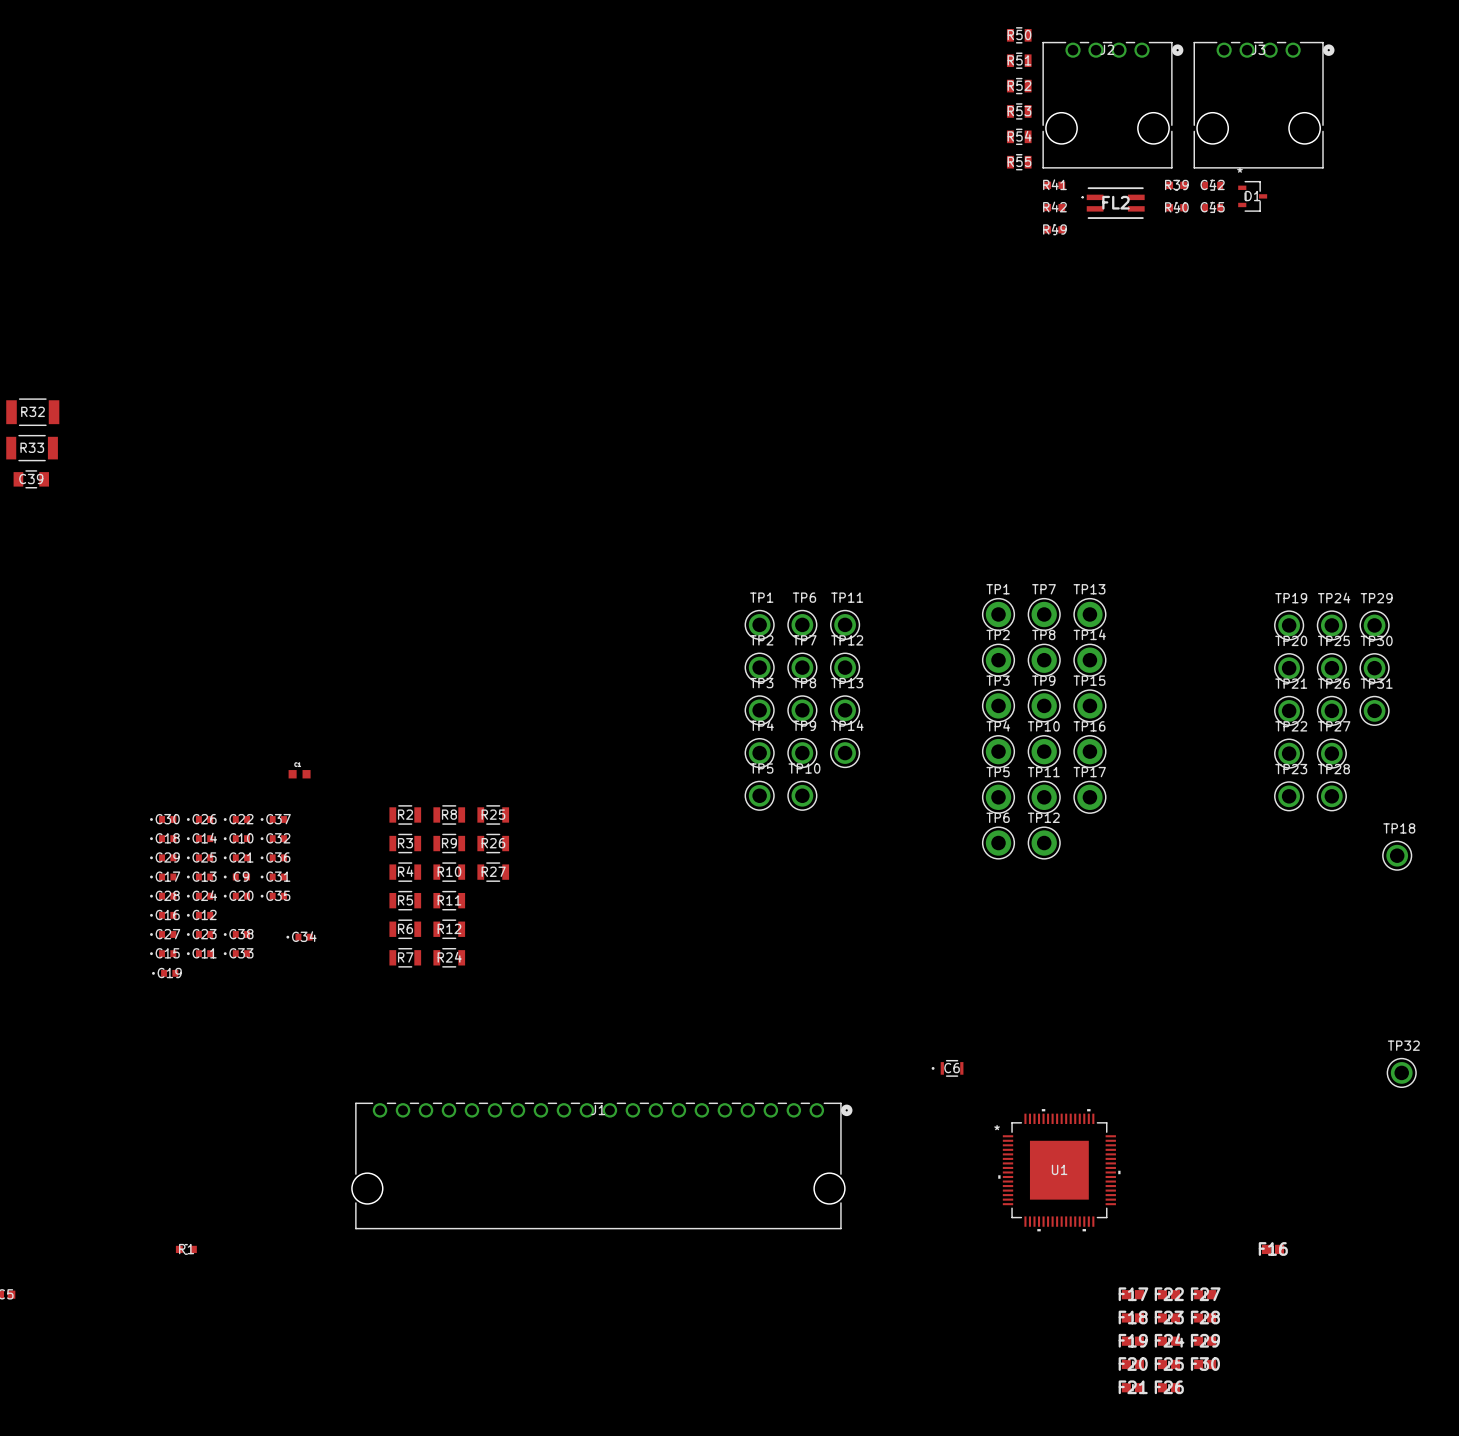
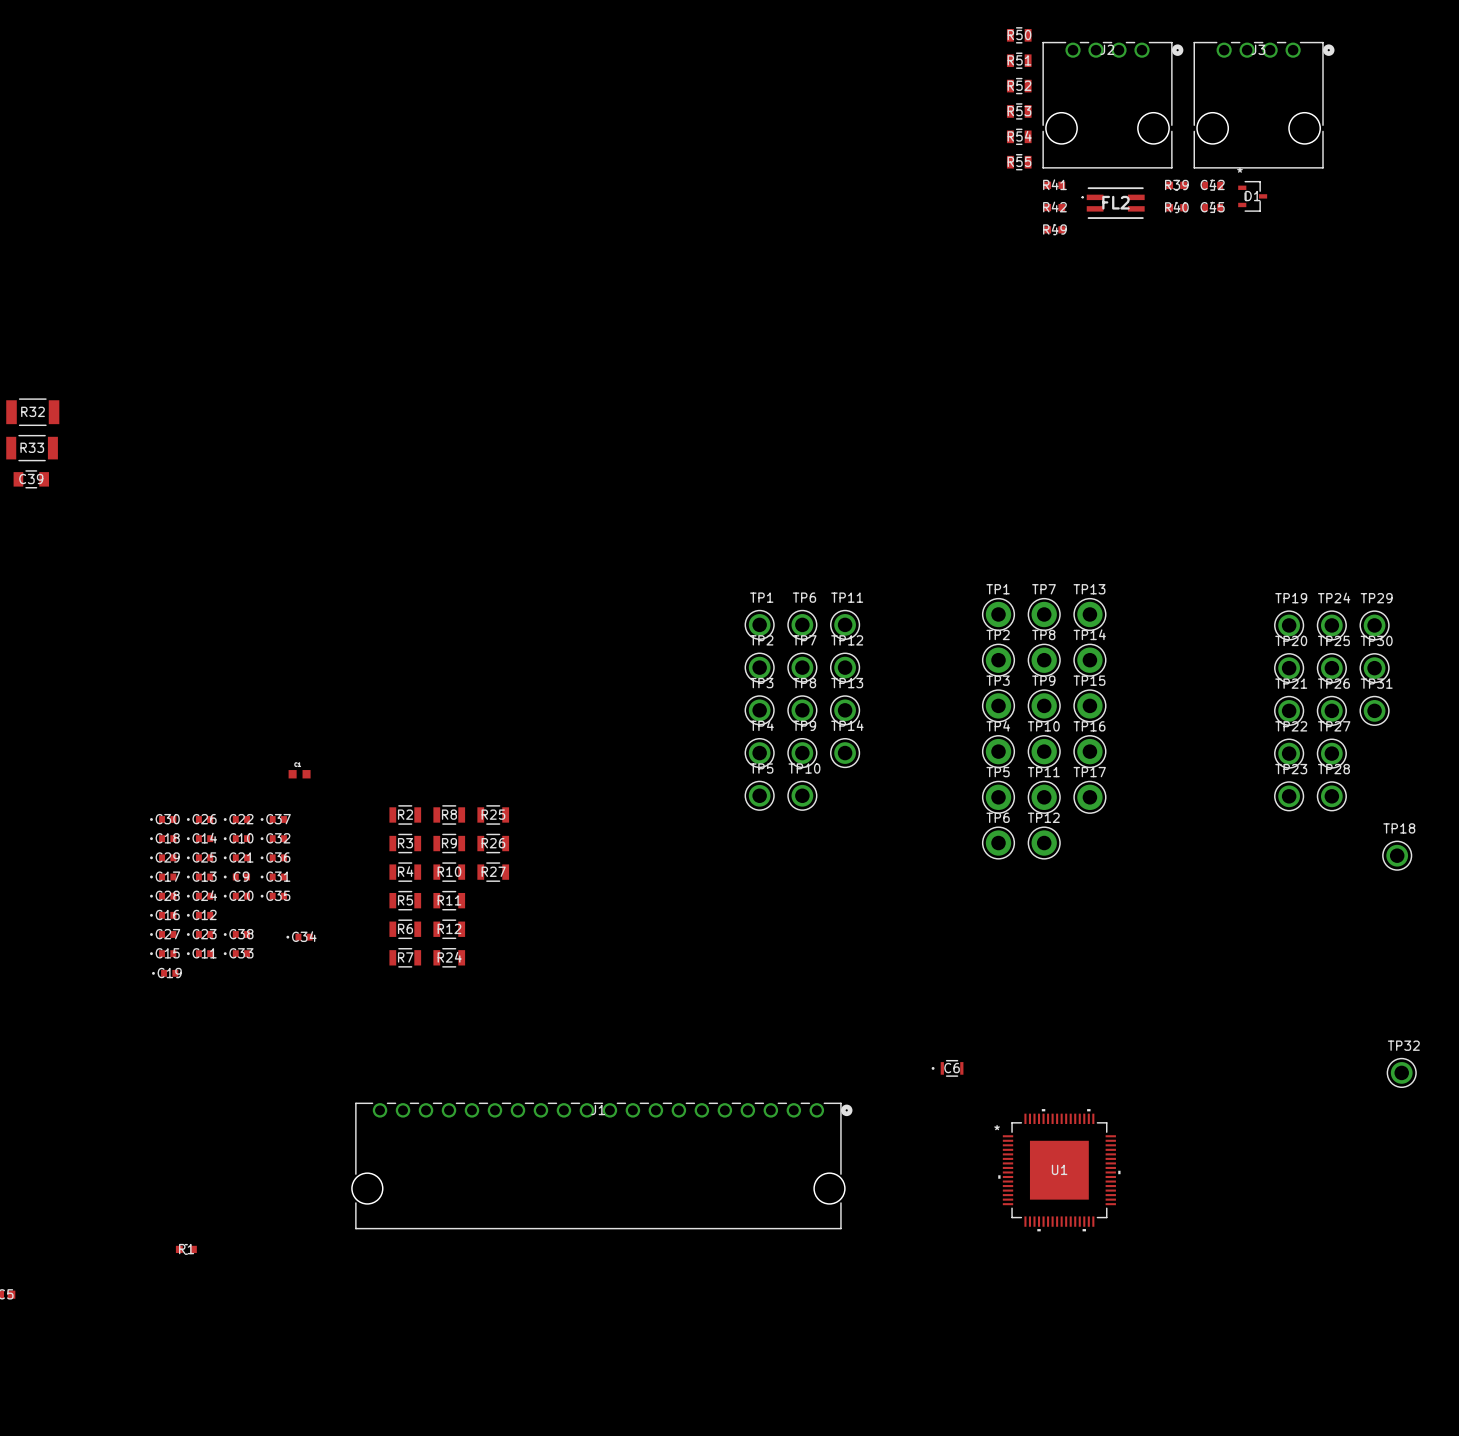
F16: (1273, 1249) -> none
F17: (1132, 1294) -> none
F22: (1169, 1294) -> none
F27: (1205, 1294) -> none
F18: (1132, 1317) -> none
F23: (1169, 1317) -> none
F28: (1205, 1317) -> none
F19: (1132, 1341) -> none
F24: (1169, 1341) -> none
F29: (1205, 1341) -> none
F20: (1132, 1364) -> none
F25: (1169, 1364) -> none
F30: (1205, 1364) -> none
F21: (1132, 1387) -> none
F26: (1169, 1387) -> none

